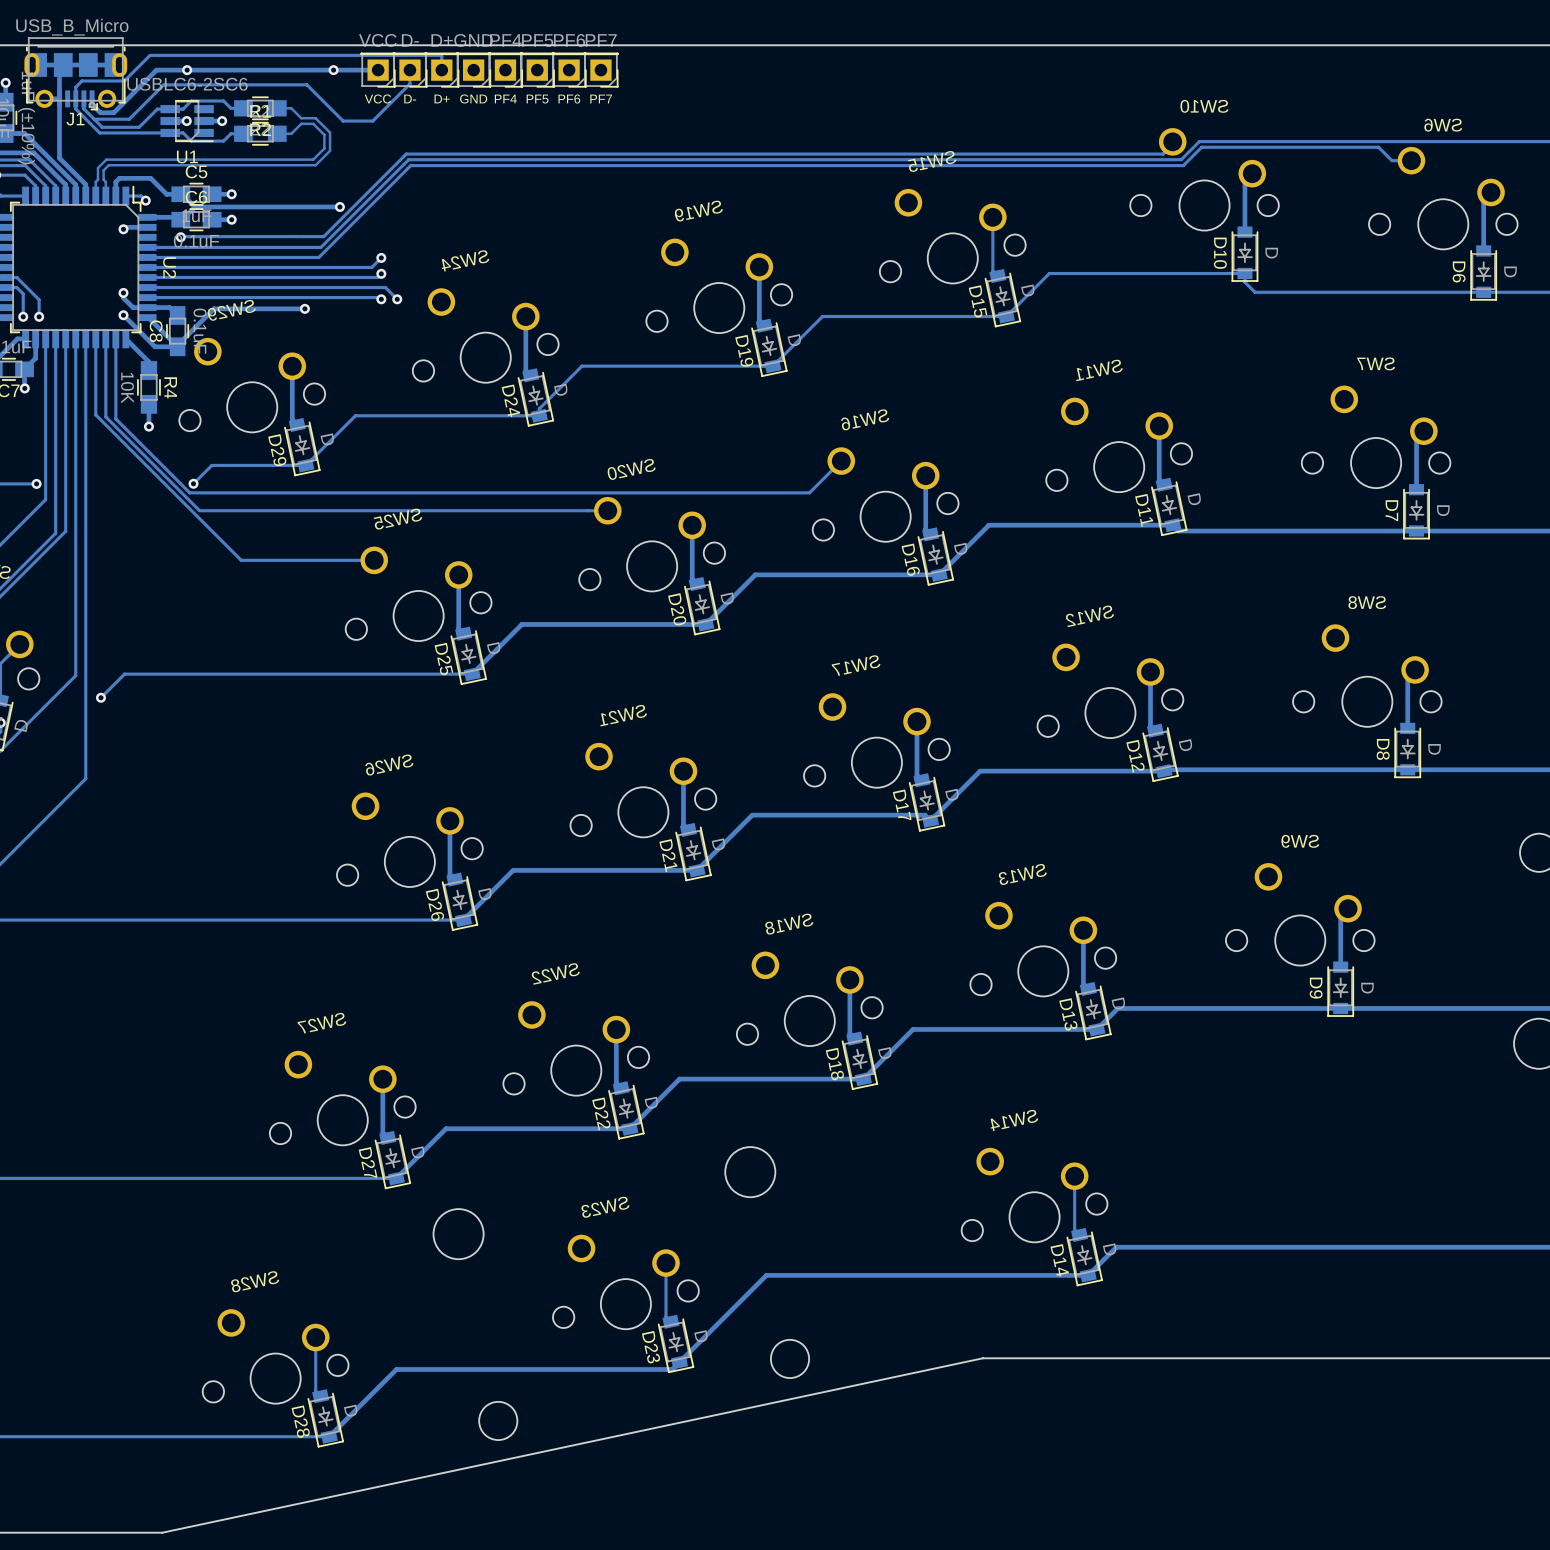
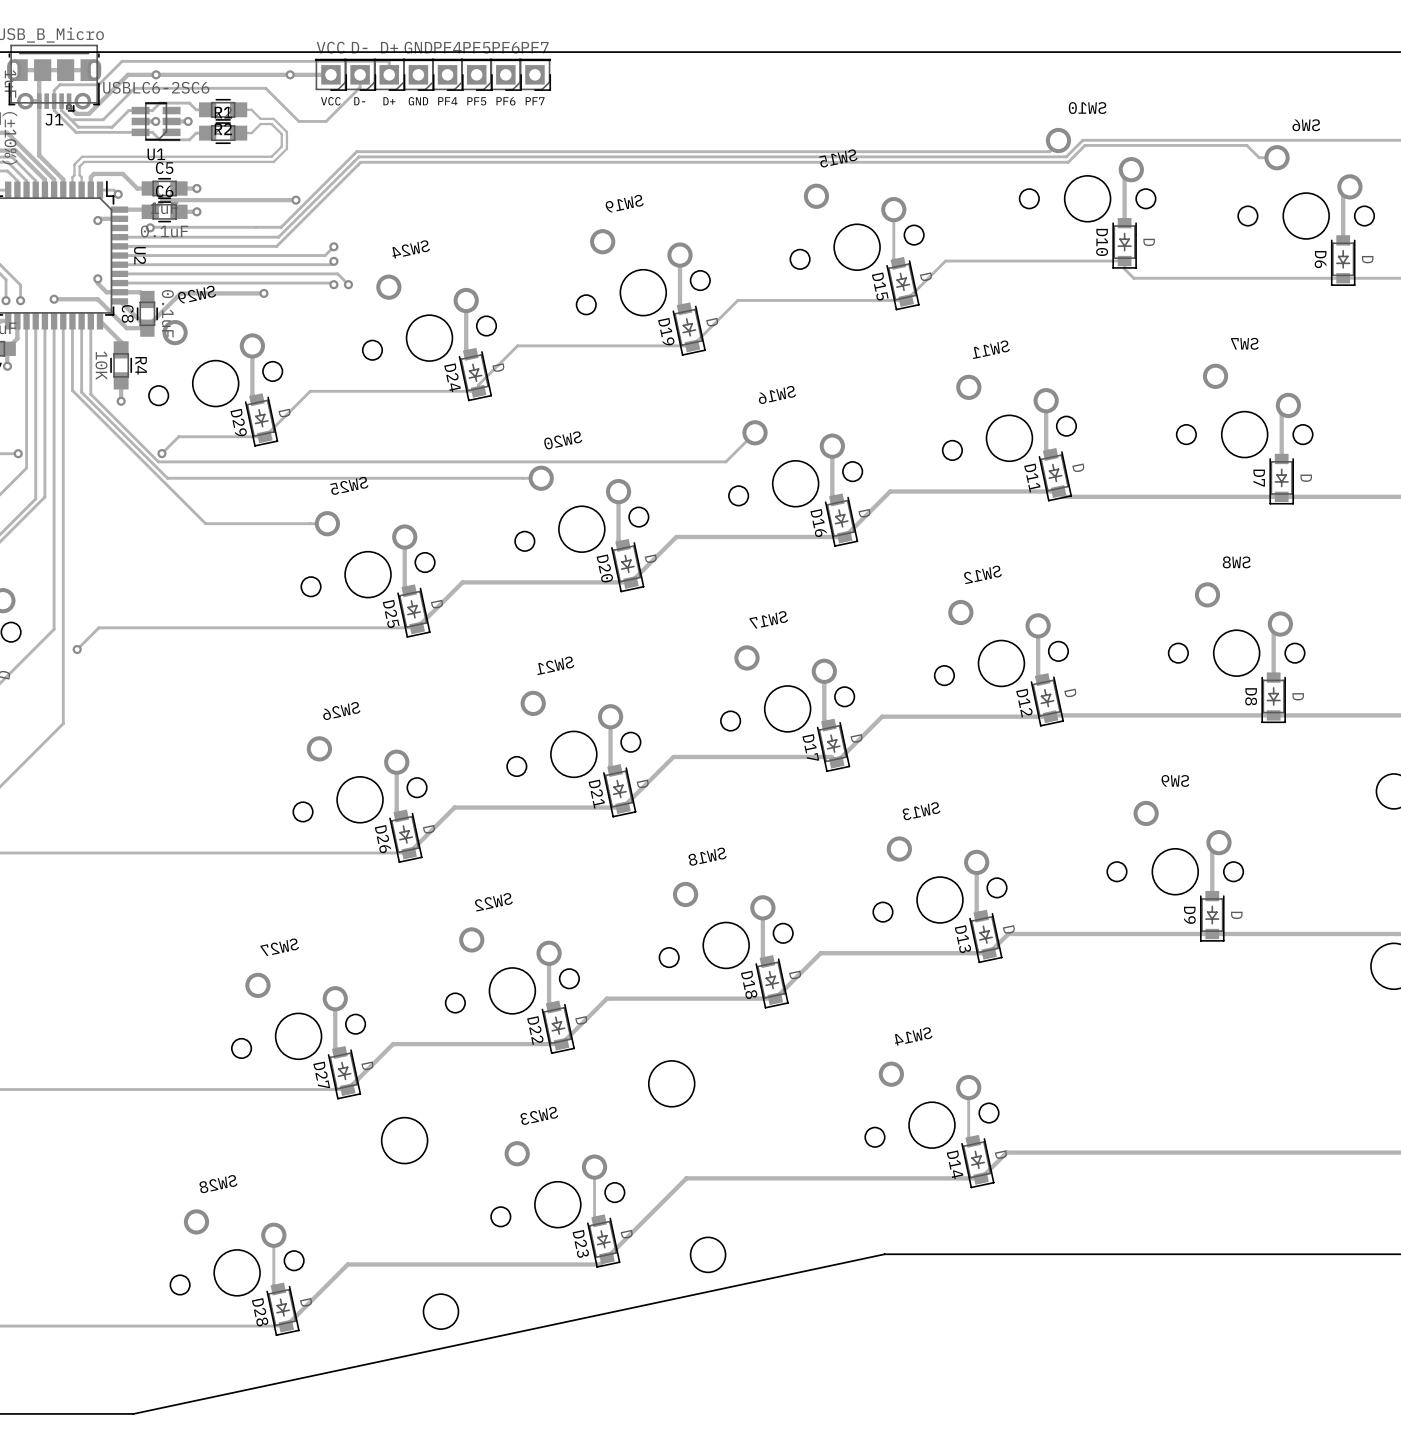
track: none -> (97, 299) (54, 299)
via position: (123, 315) -> (54, 299)

